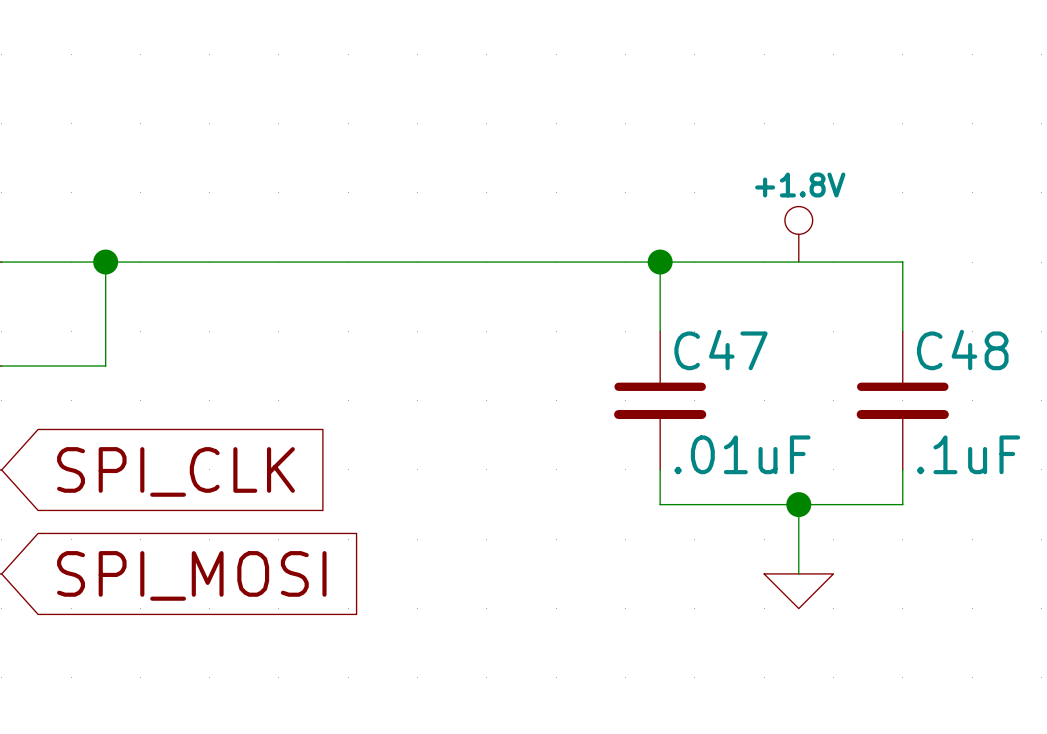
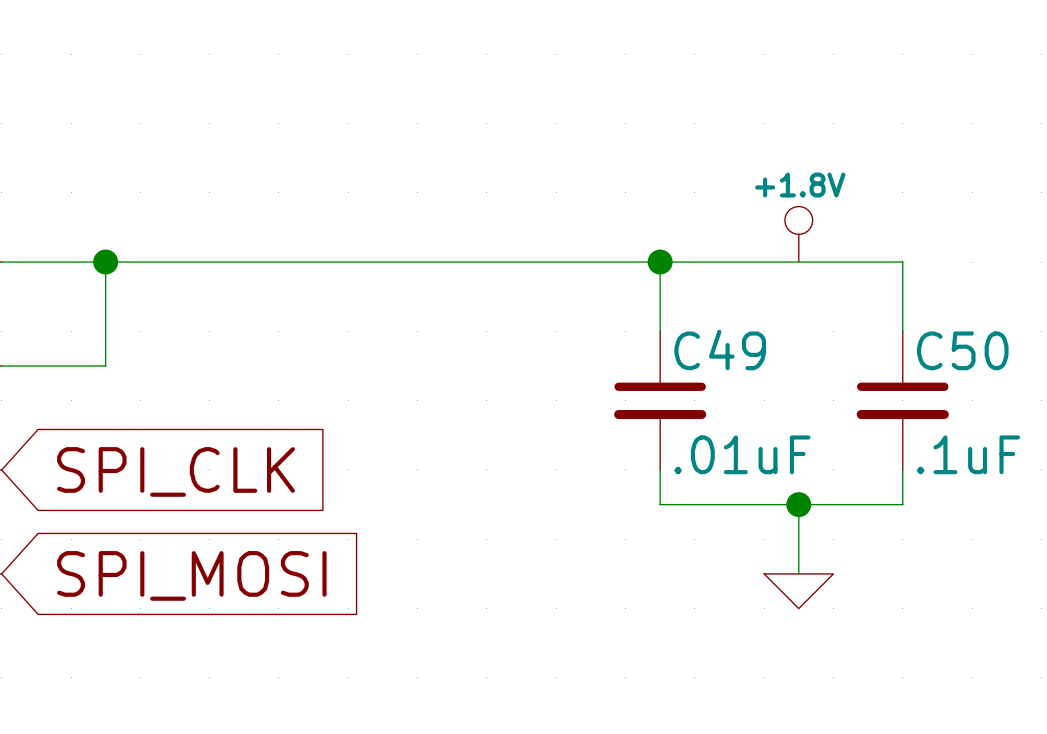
C47 name: C47 (720, 350) -> C49 (720, 350)
C48 name: C48 (962, 350) -> C50 (962, 350)

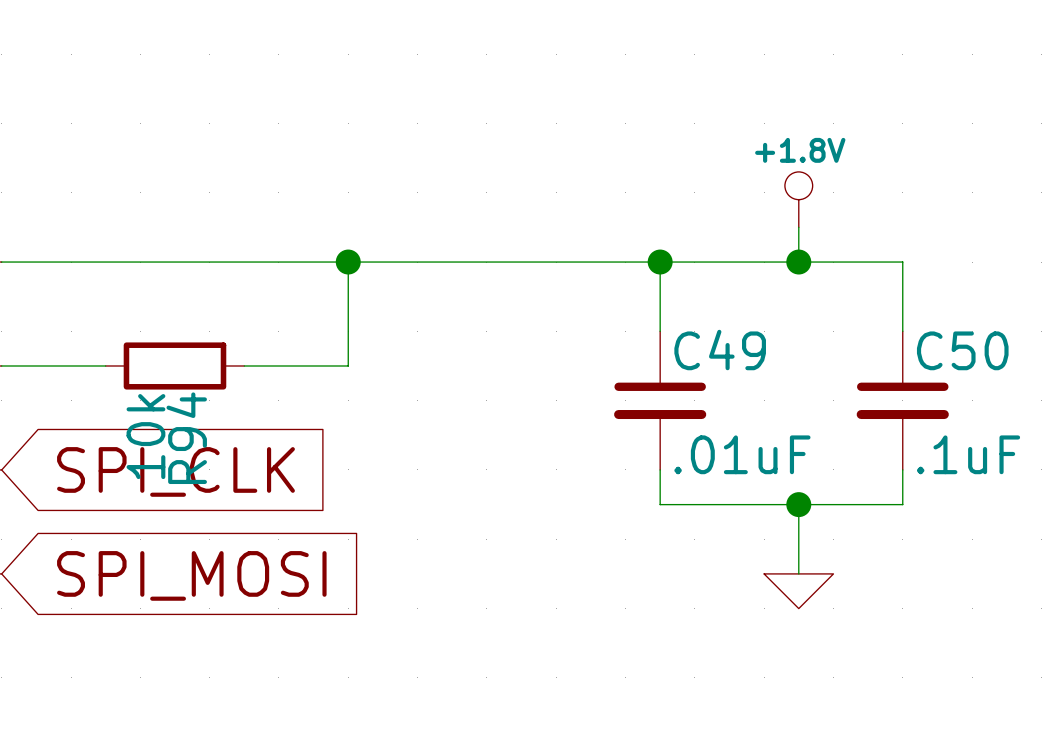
power symbol position: +1.8V (798, 234) -> +1.8V (798, 199)
wire: (105, 262) (105, 365) -> none
junction: (105, 262) -> none
wire: none -> (348, 262) (348, 365) (244, 365)
junction: none -> (348, 262)
junction: none -> (798, 262)
R94: none -> 10k (174, 365)

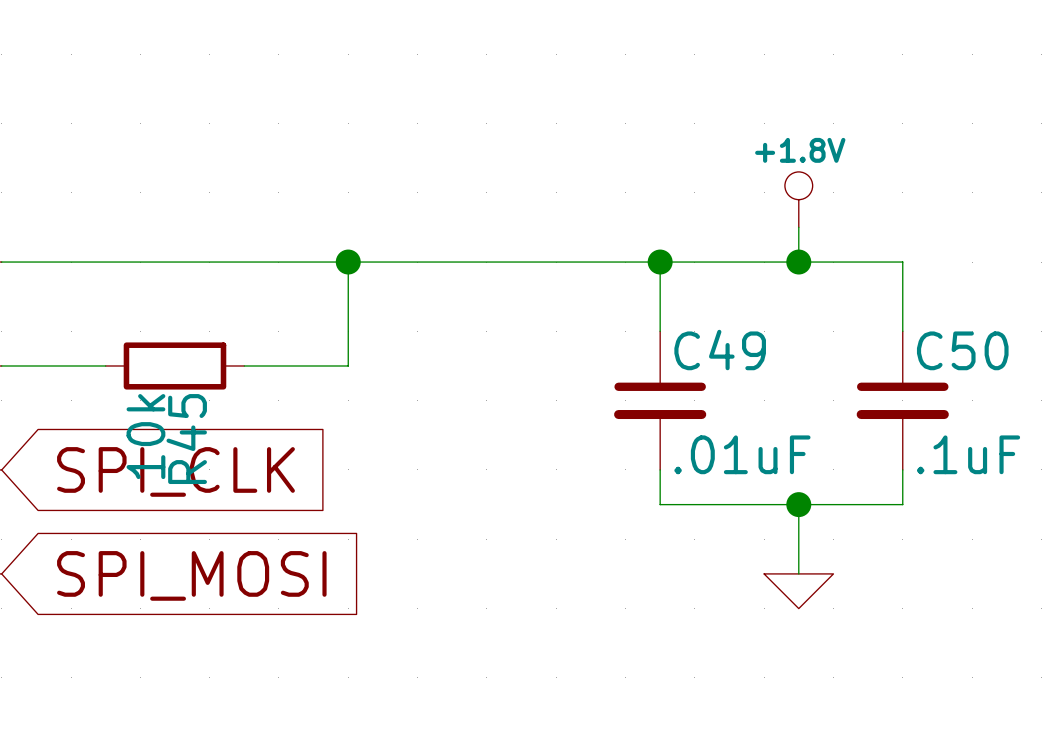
R94 name: R94 (186, 438) -> R45 (186, 439)

